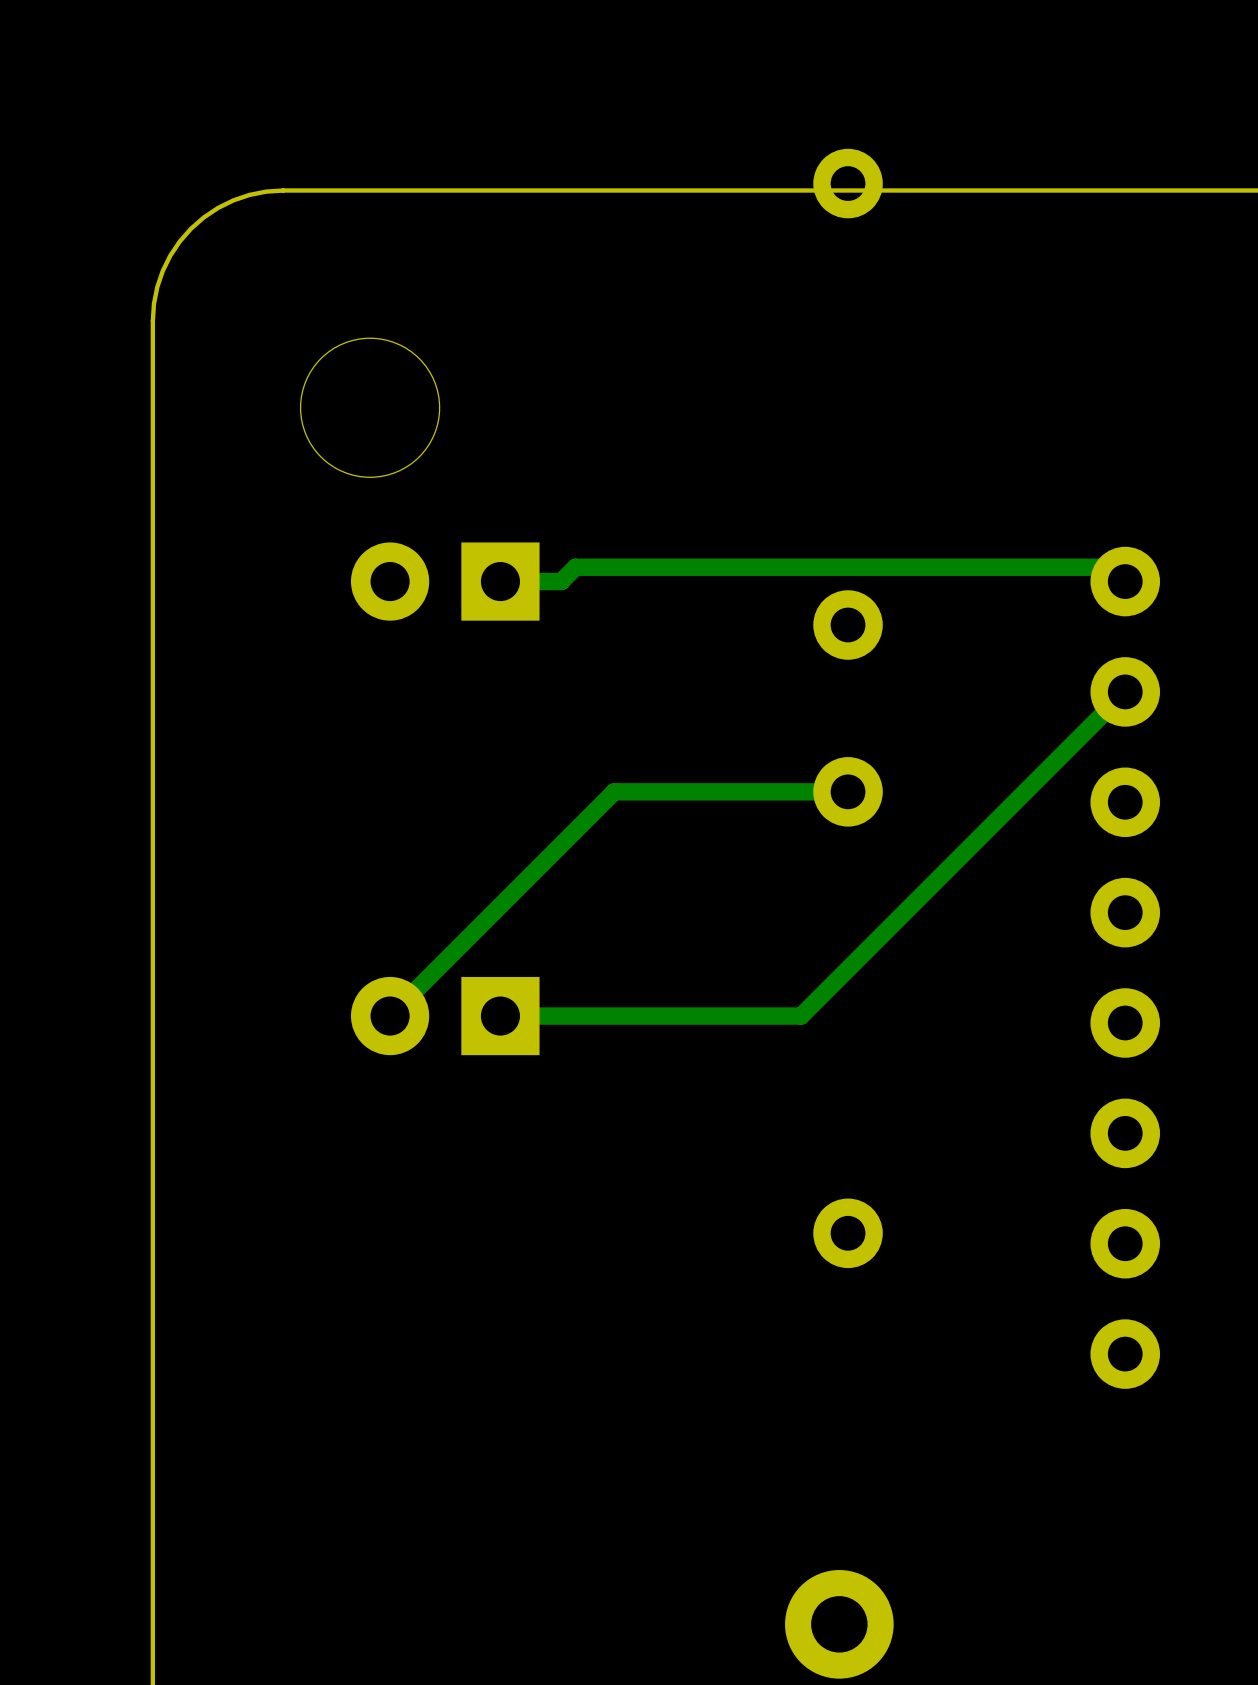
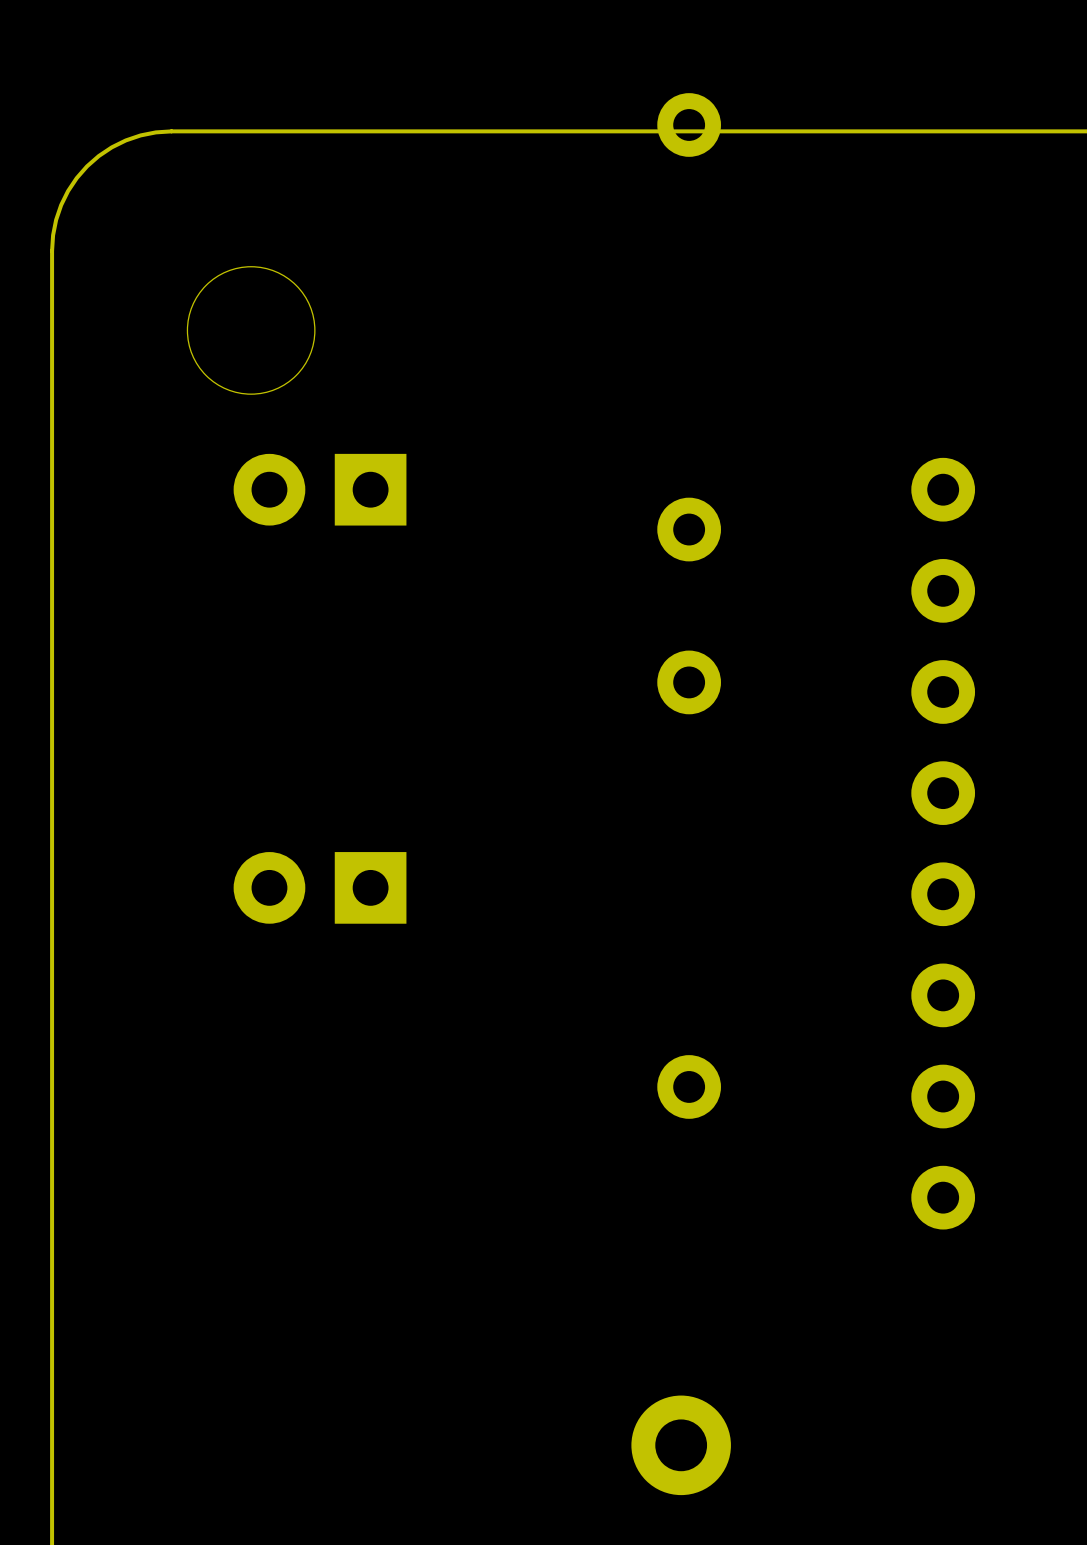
track: (1125, 581) (1110, 567) (575, 567) (561, 581) (500, 581) -> none
track: (1125, 691) (801, 1016) (500, 1016) -> none
track: (848, 791) (614, 791) (390, 1016) -> none

